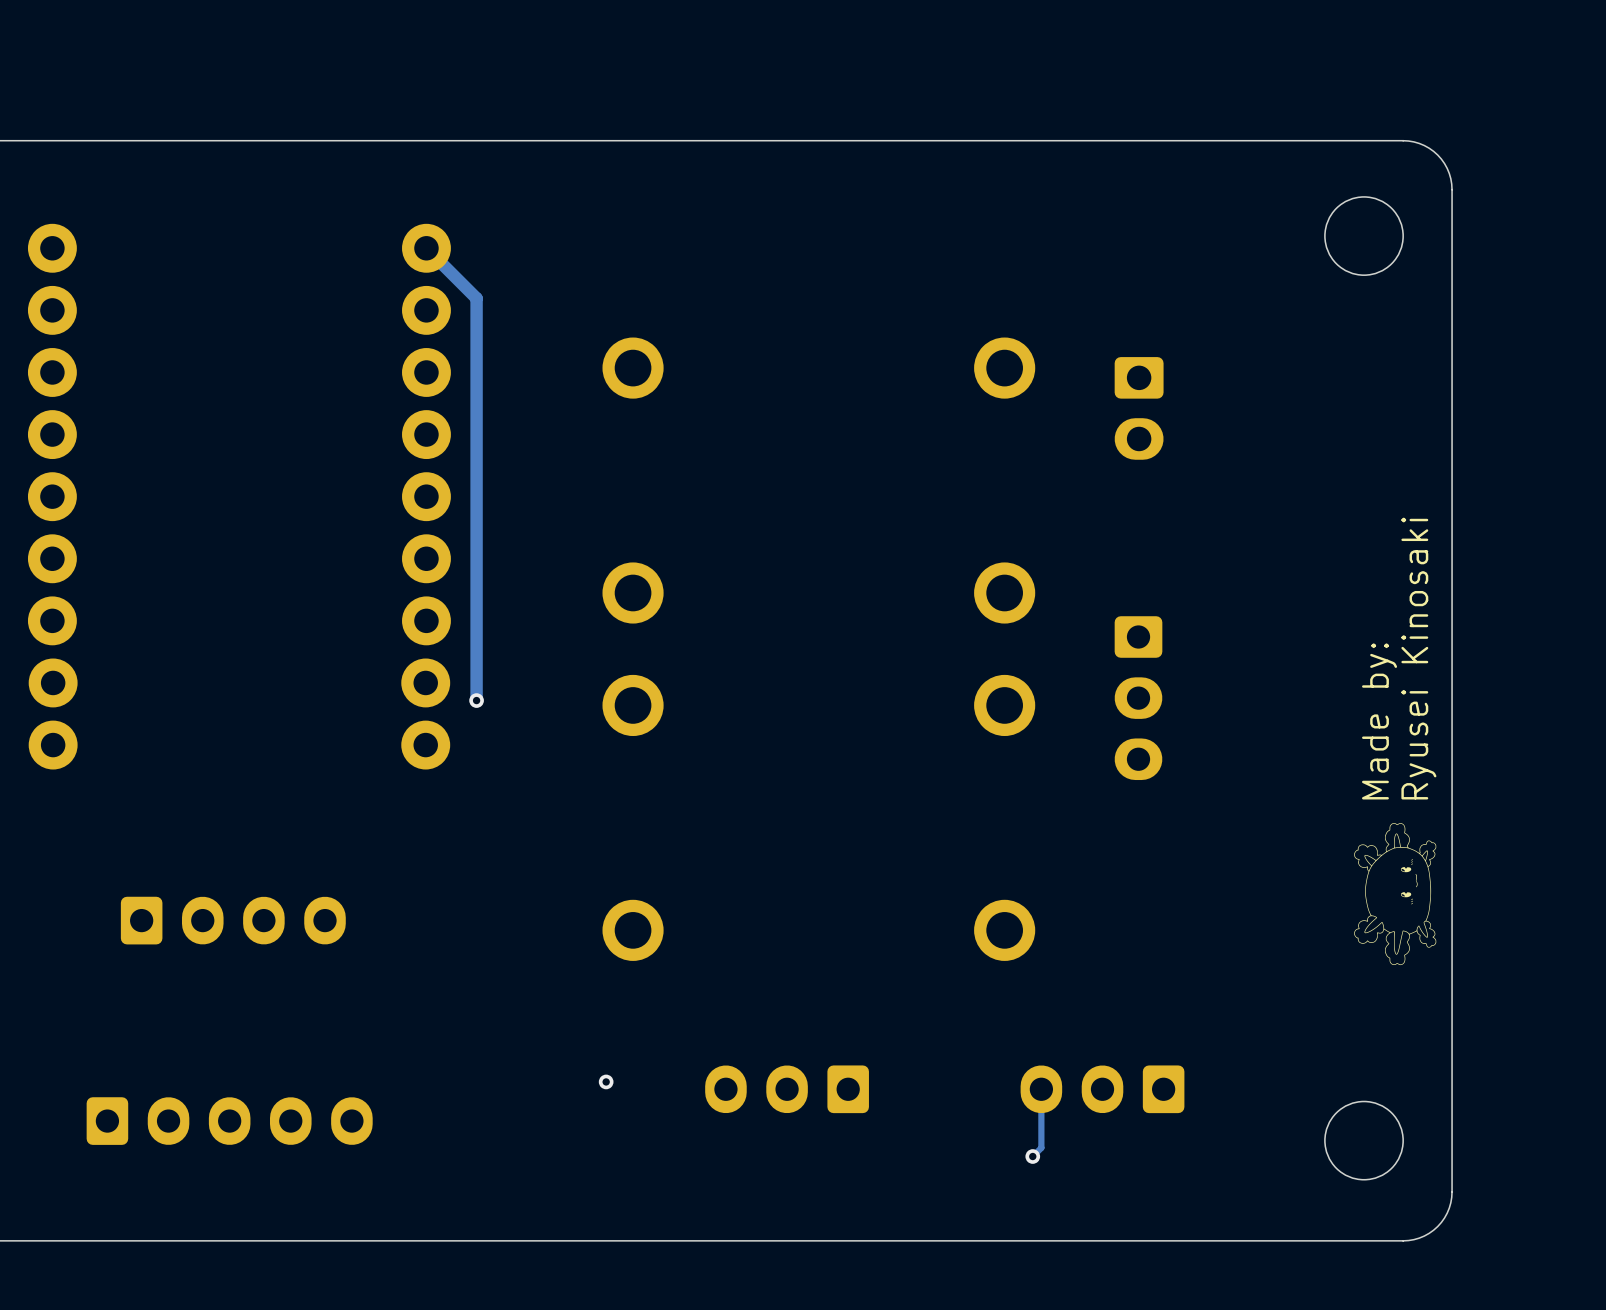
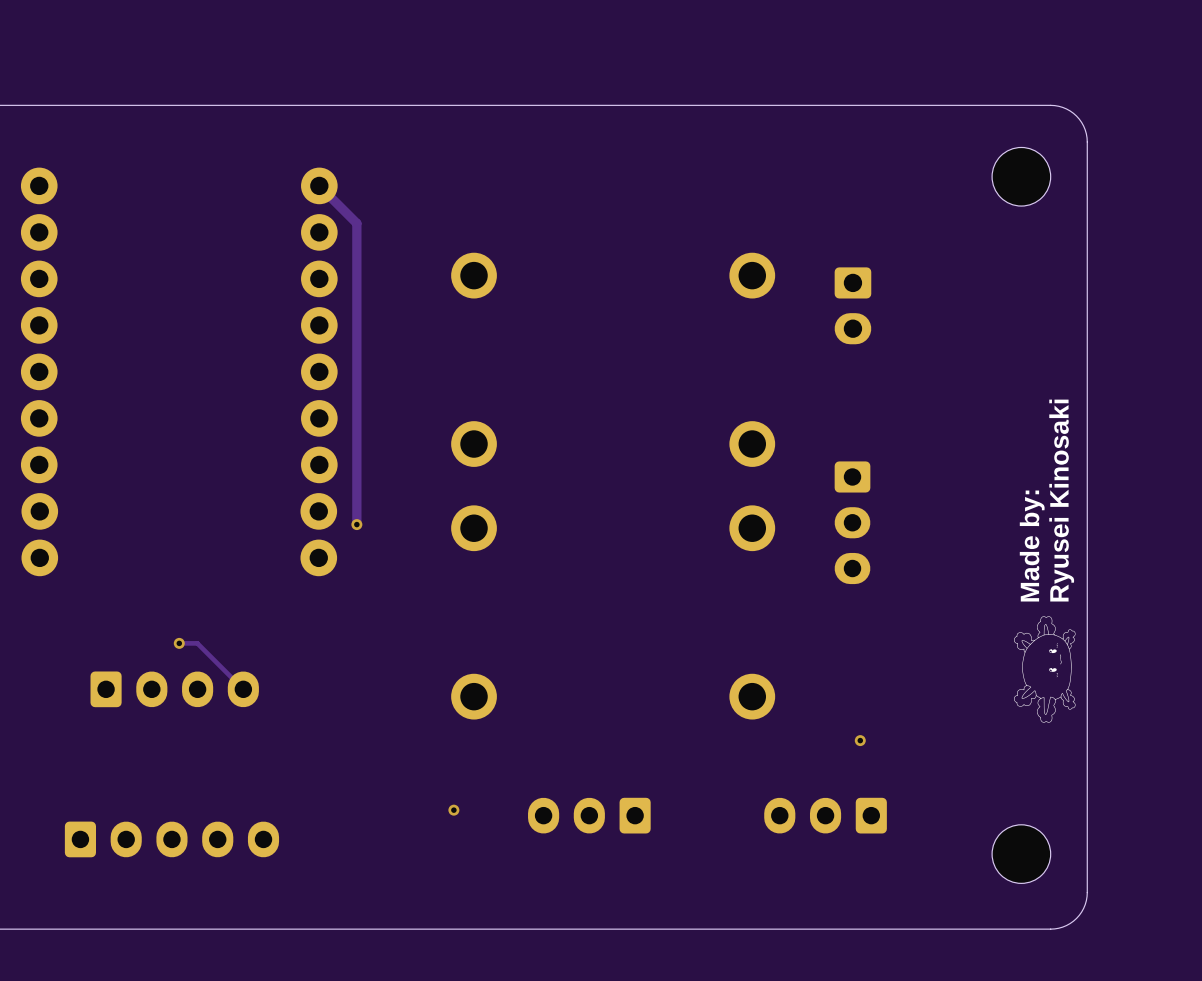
track: none -> (179, 643) (197, 643) (243, 689)
via: none -> (179, 643)
via: none -> (860, 740)
track: (1041, 1089) (1041, 1147) (1032, 1156) -> none
via: (1032, 1156) -> none

